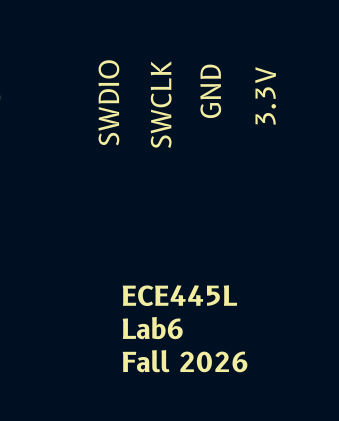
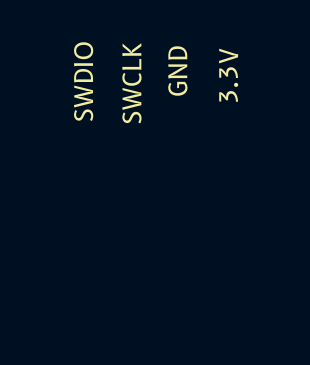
text: ECE445L (179, 295) -> none
text: Lab6 (152, 328) -> none
text: Fall 2026 (185, 361) -> none

